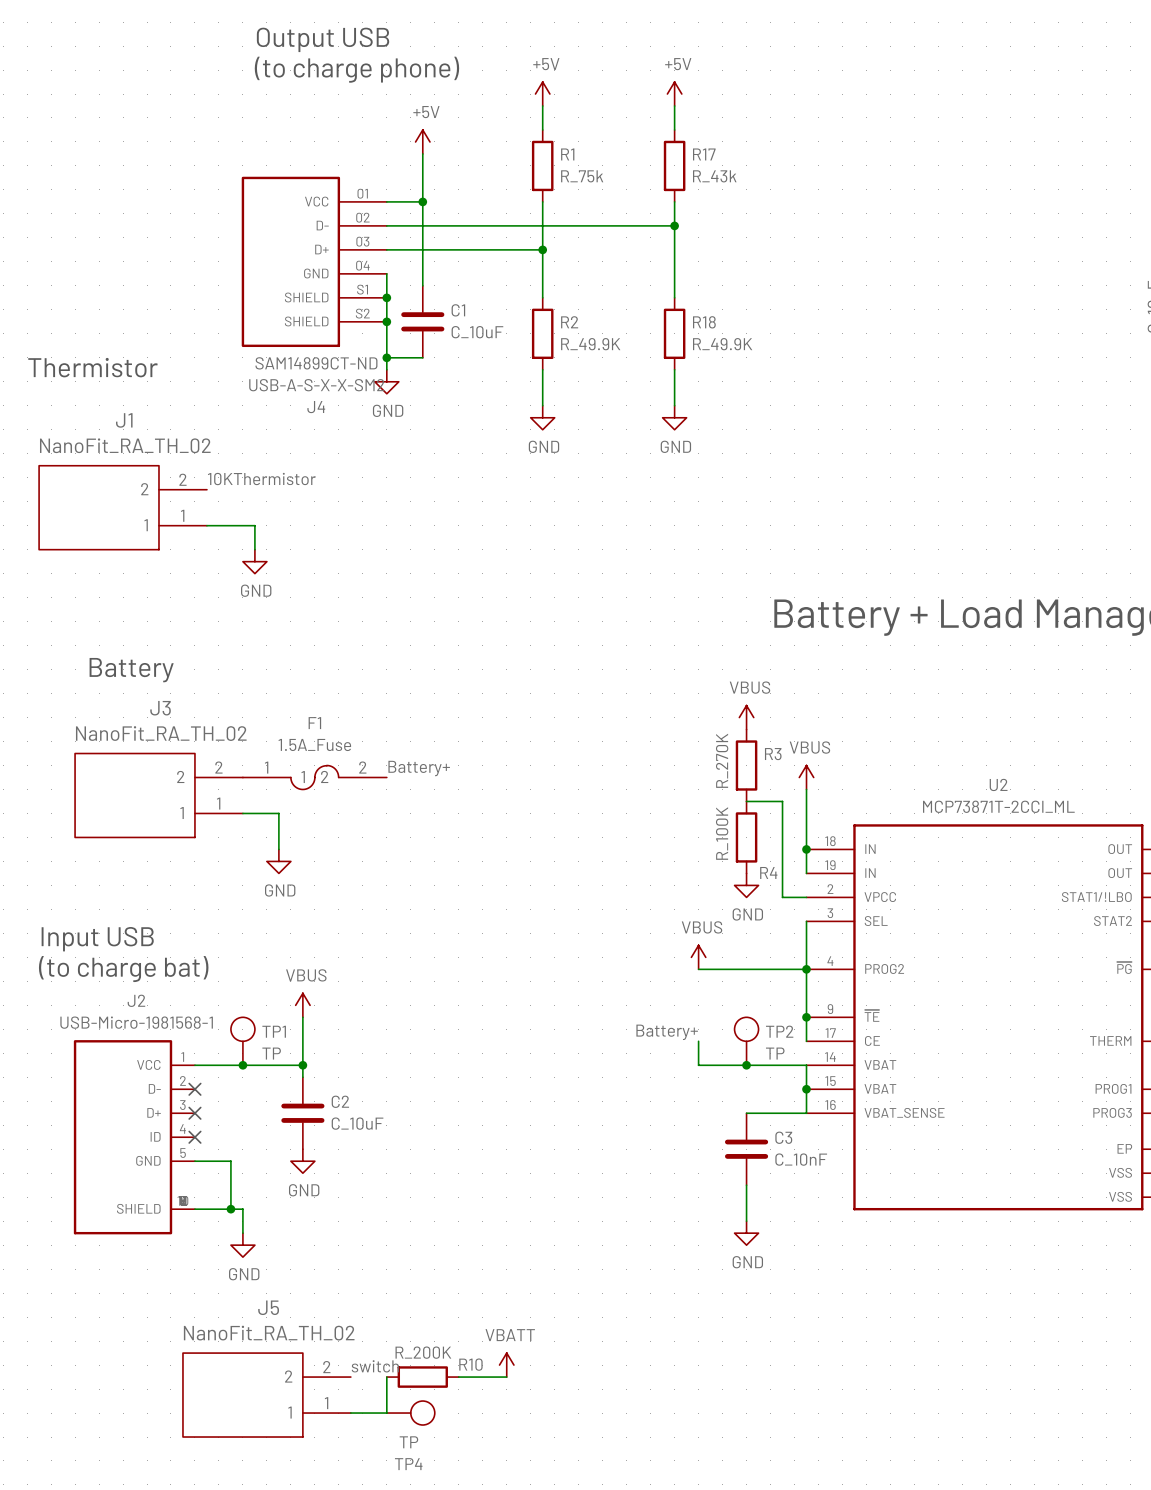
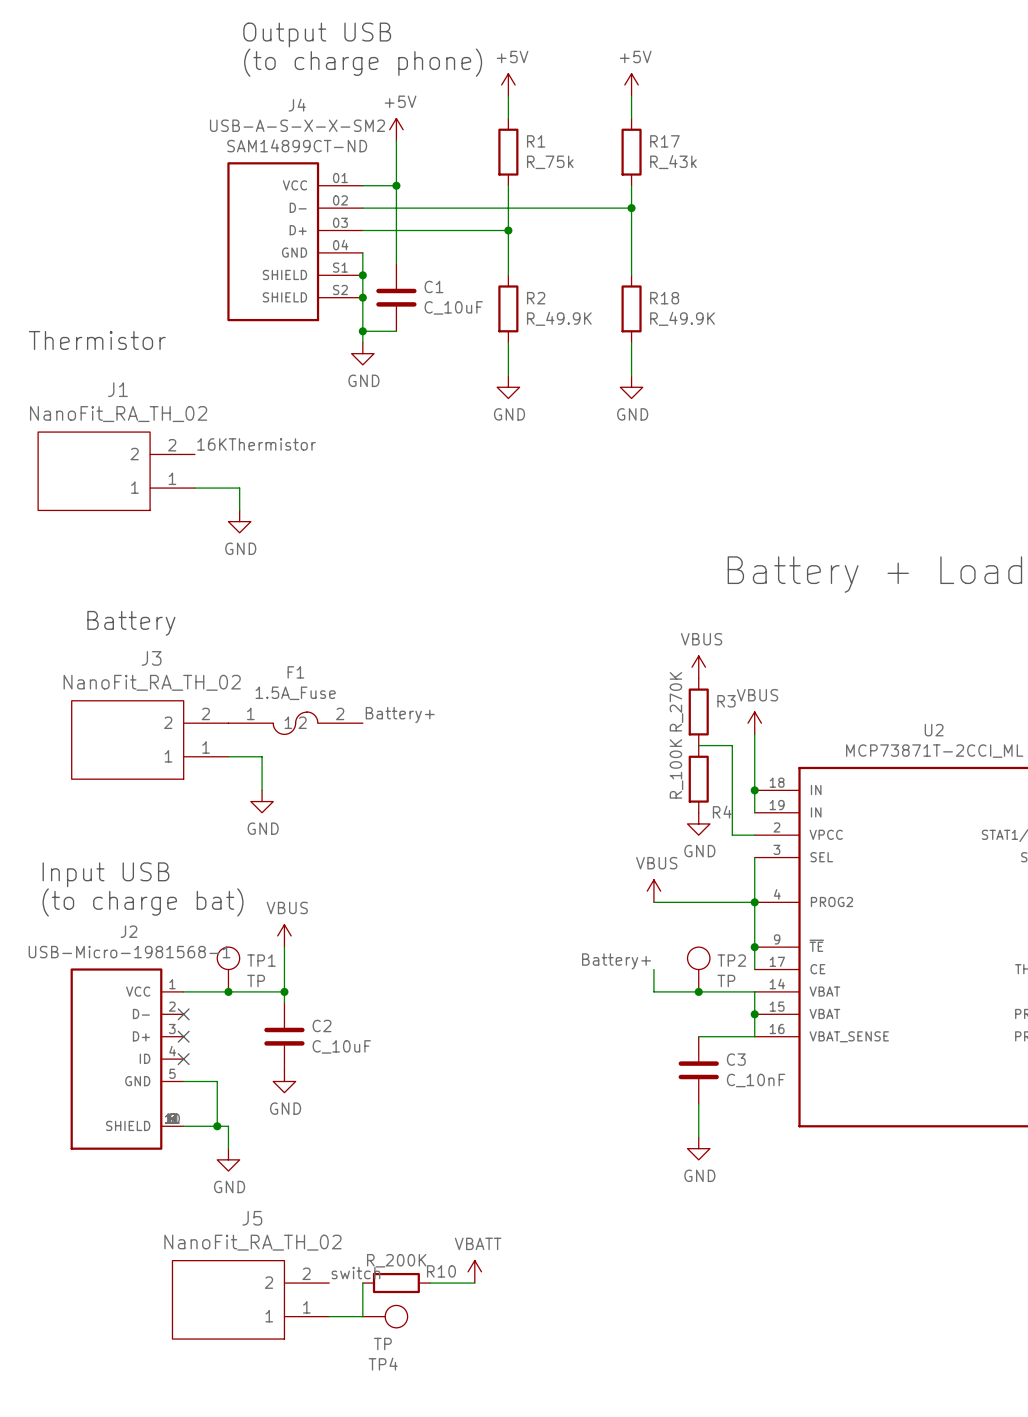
J4 text position: SAM14899CT-ND (316, 363) -> SAM14899CT-ND (297, 145)
J4 value position: USB-A-S-X-X-SM2 (316, 385) -> USB-A-S-X-X-SM2 (297, 125)
J4 name position: J4 (316, 407) -> J4 (297, 105)
label: 10KThermistor (261, 479) -> 16KThermistor (256, 444)

